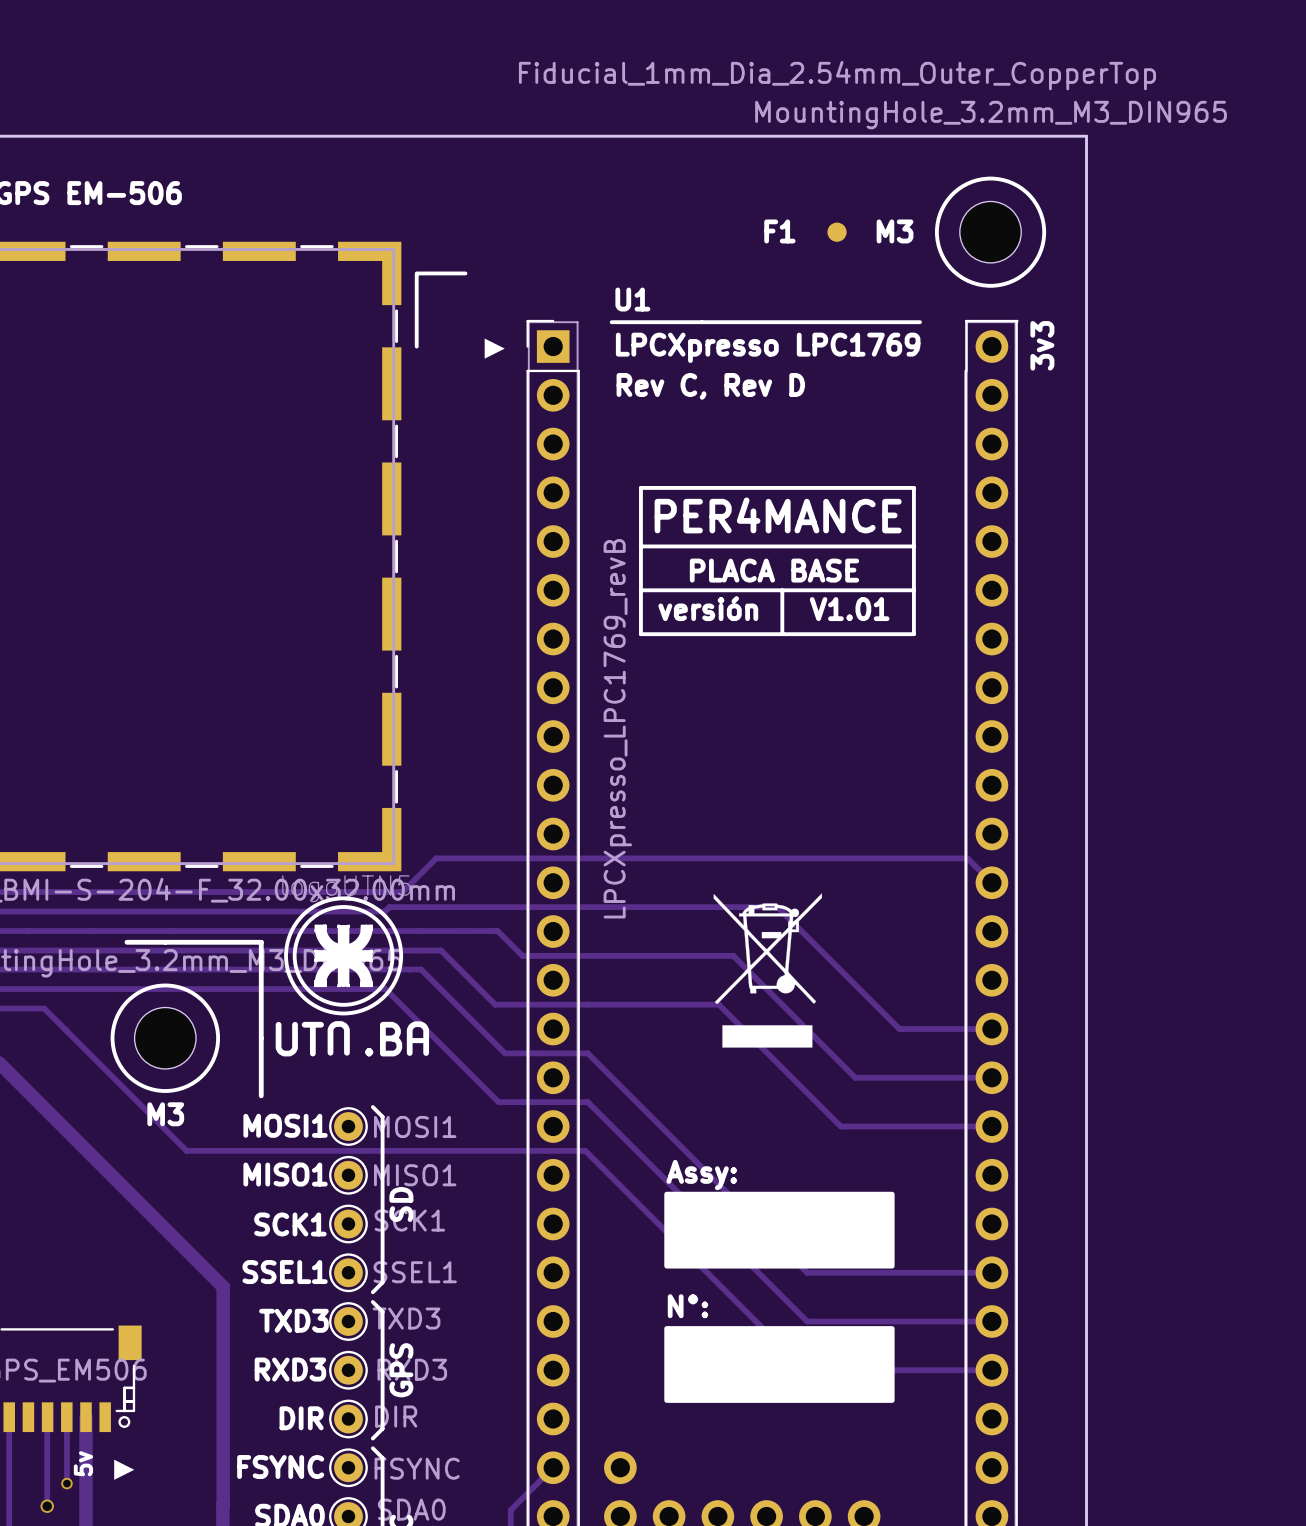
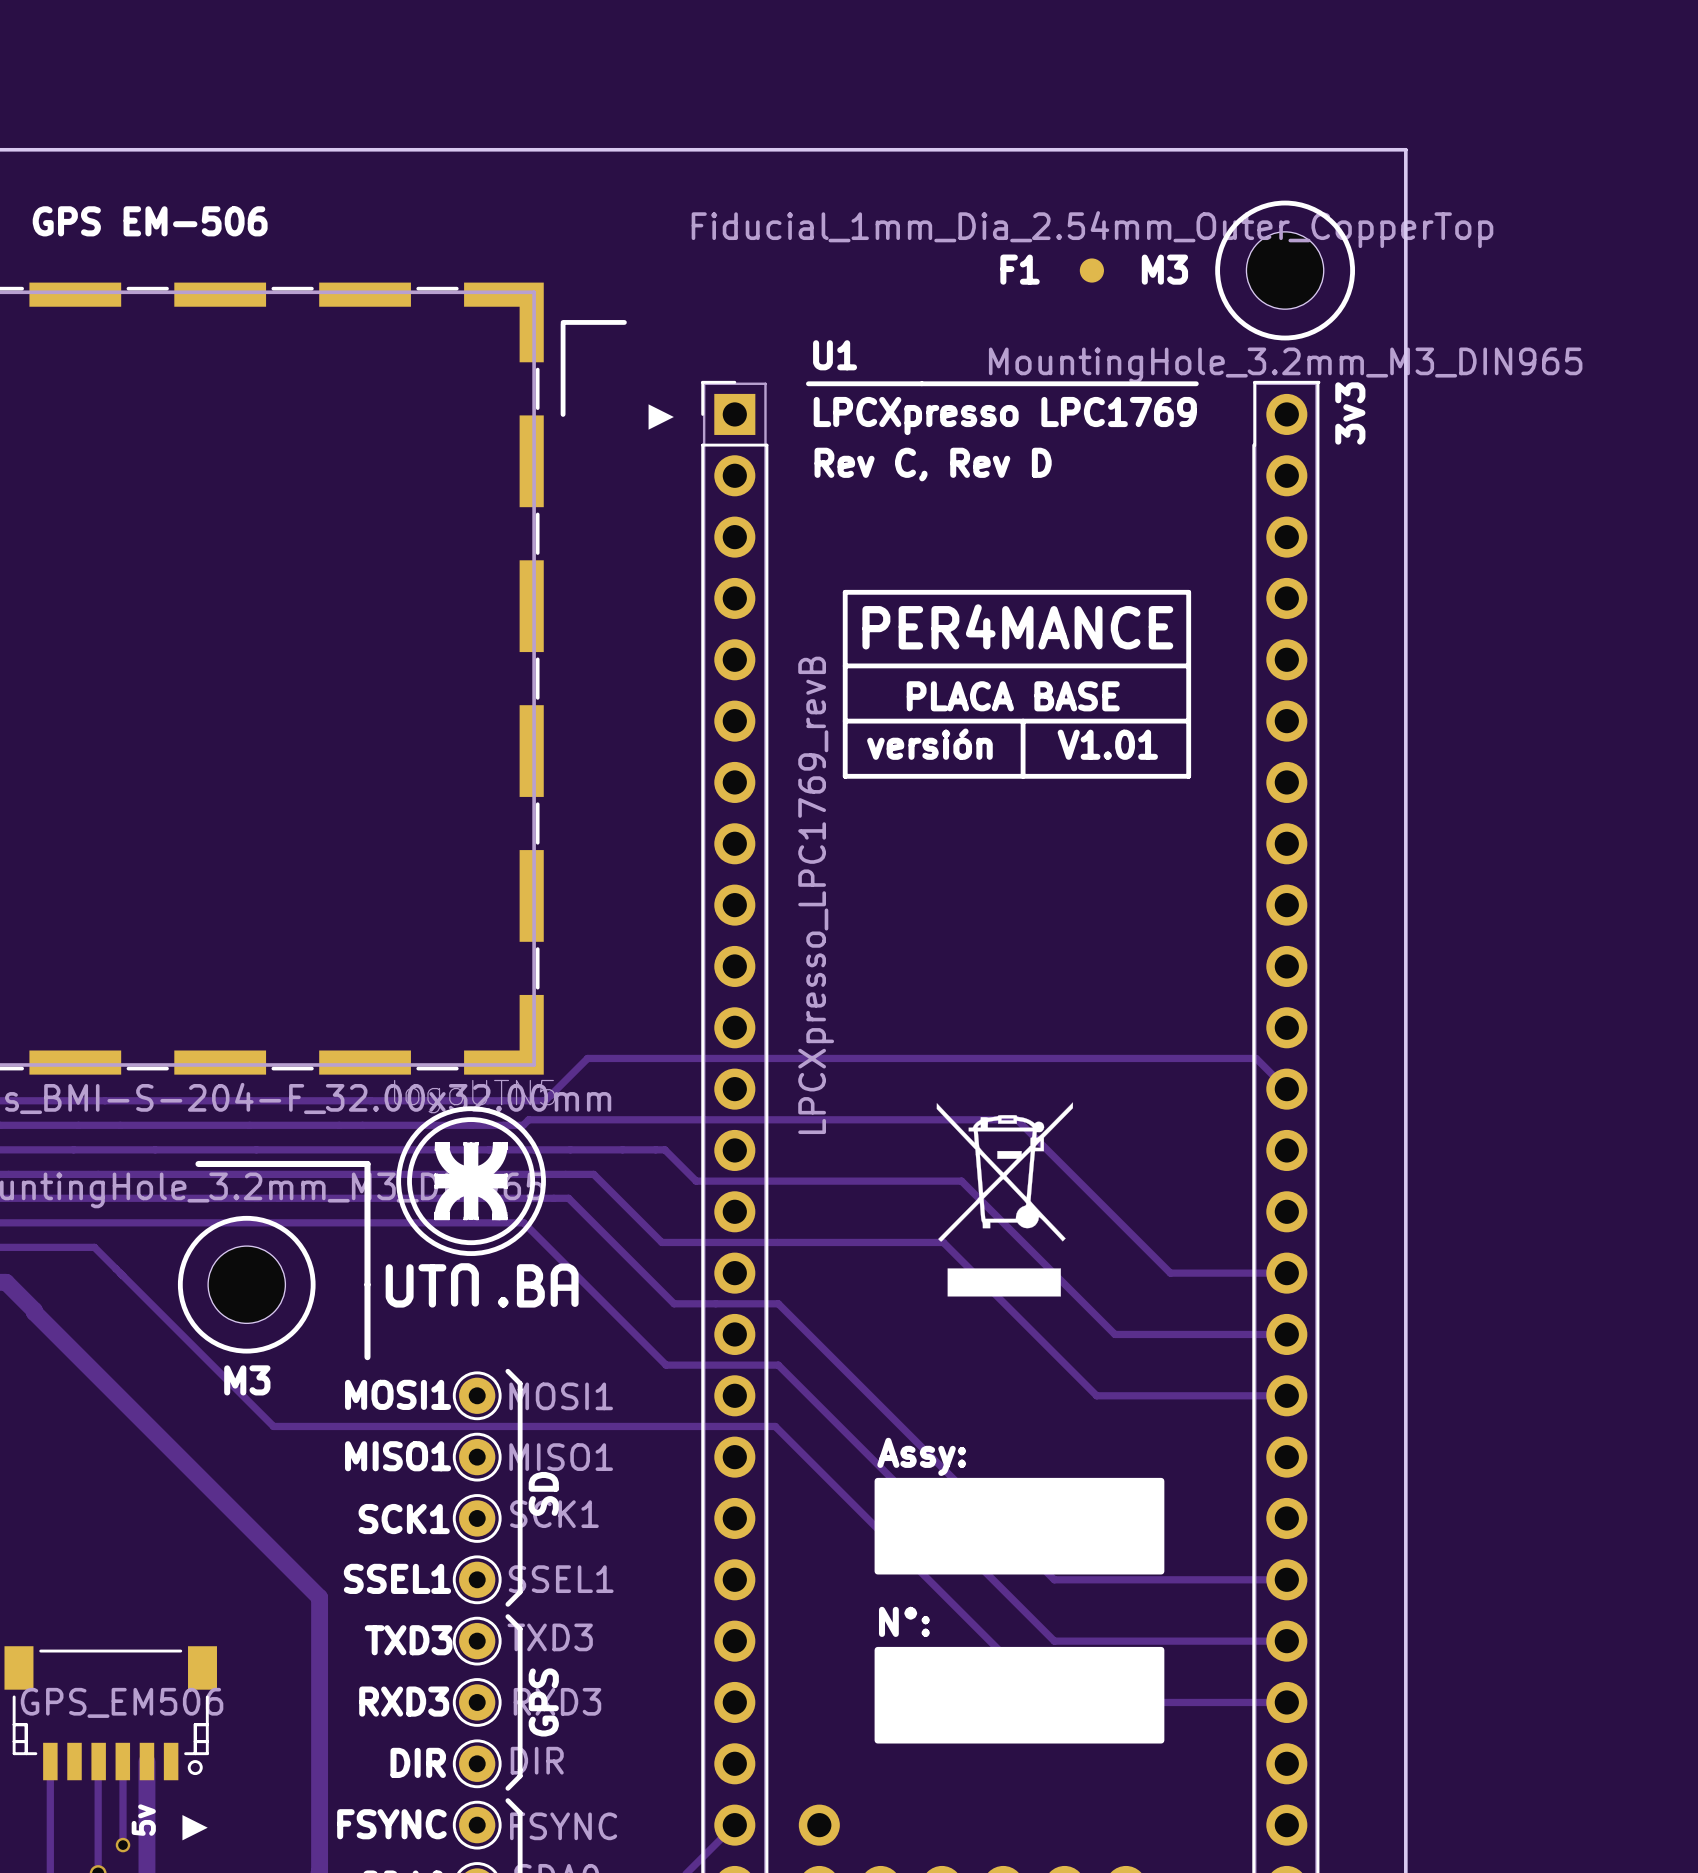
F1 value position: Fiducial_1mm_Dia_2.54mm_Outer_CopperTop (837, 75) -> Fiducial_1mm_Dia_2.54mm_Outer_CopperTop (1092, 229)
M3 value position: MountingHole_3.2mm_M3_DIN965 (991, 115) -> MountingHole_3.2mm_M3_DIN965 (1285, 365)

